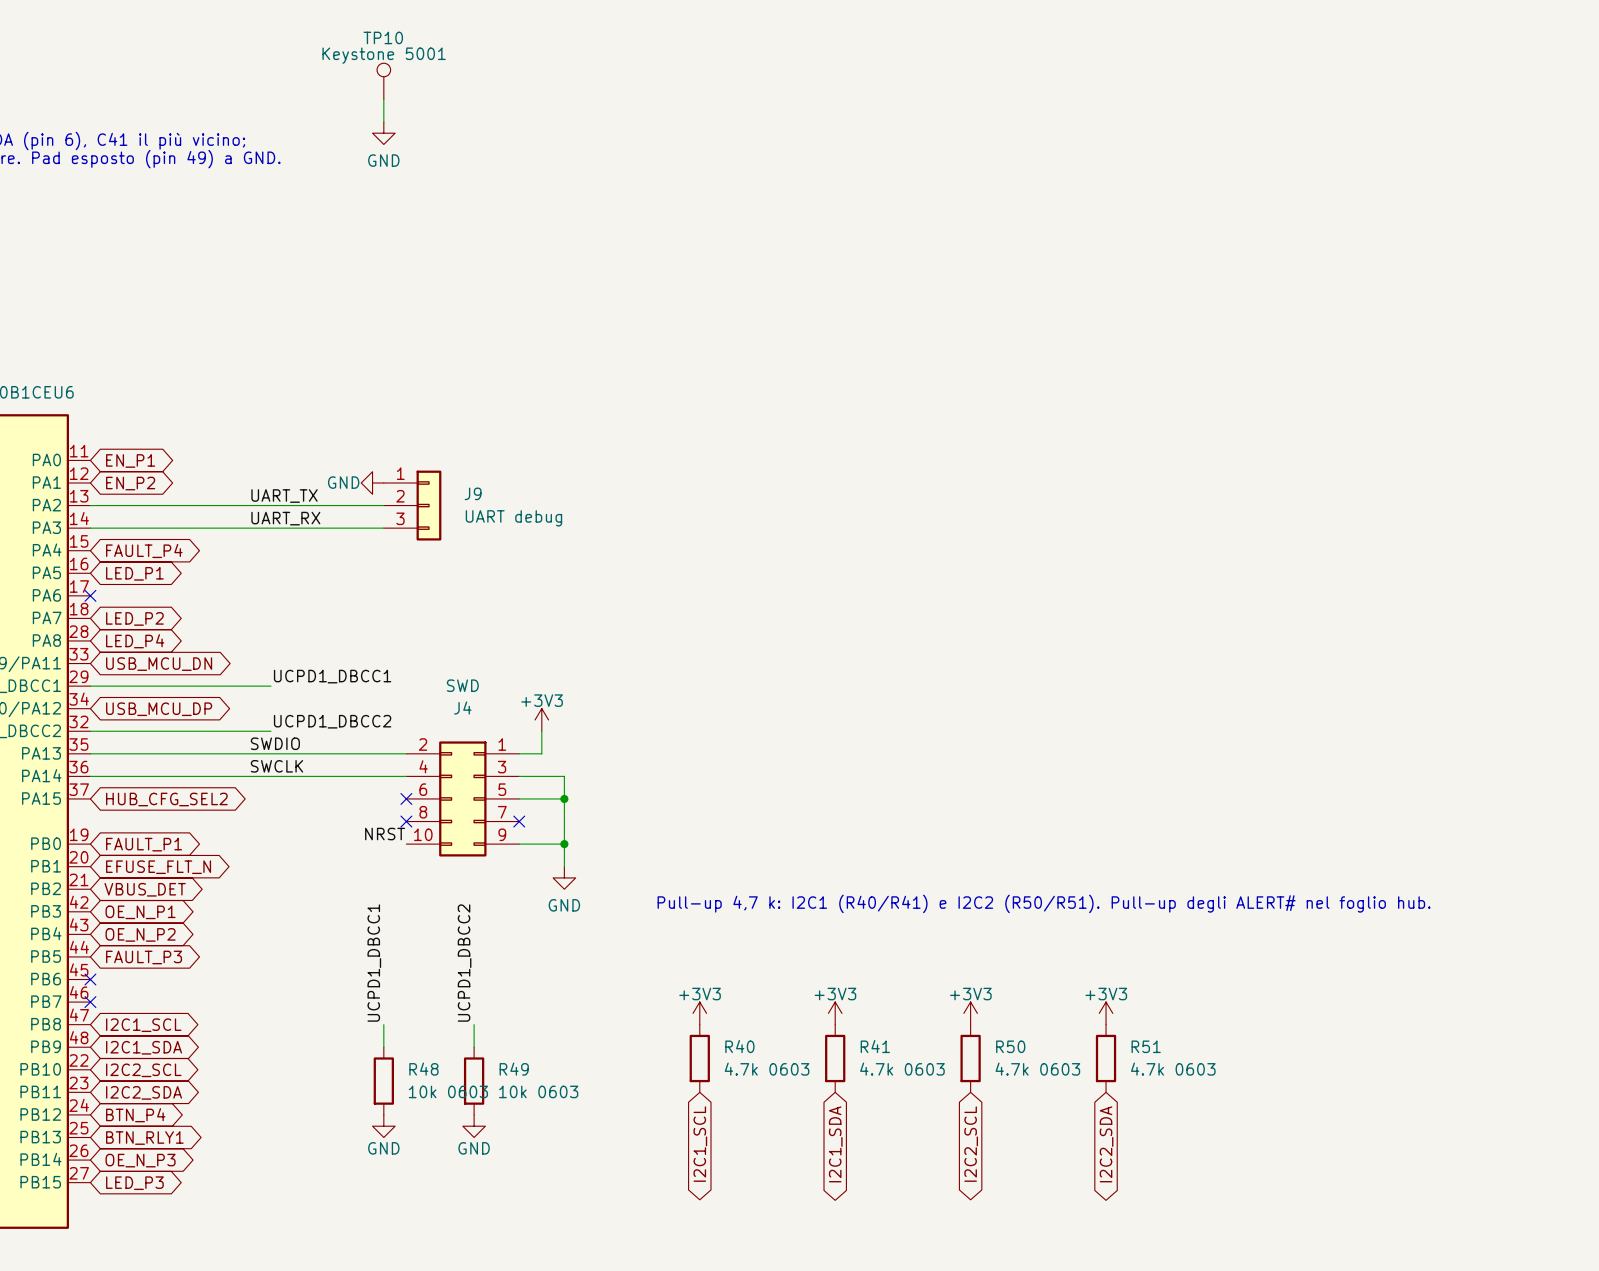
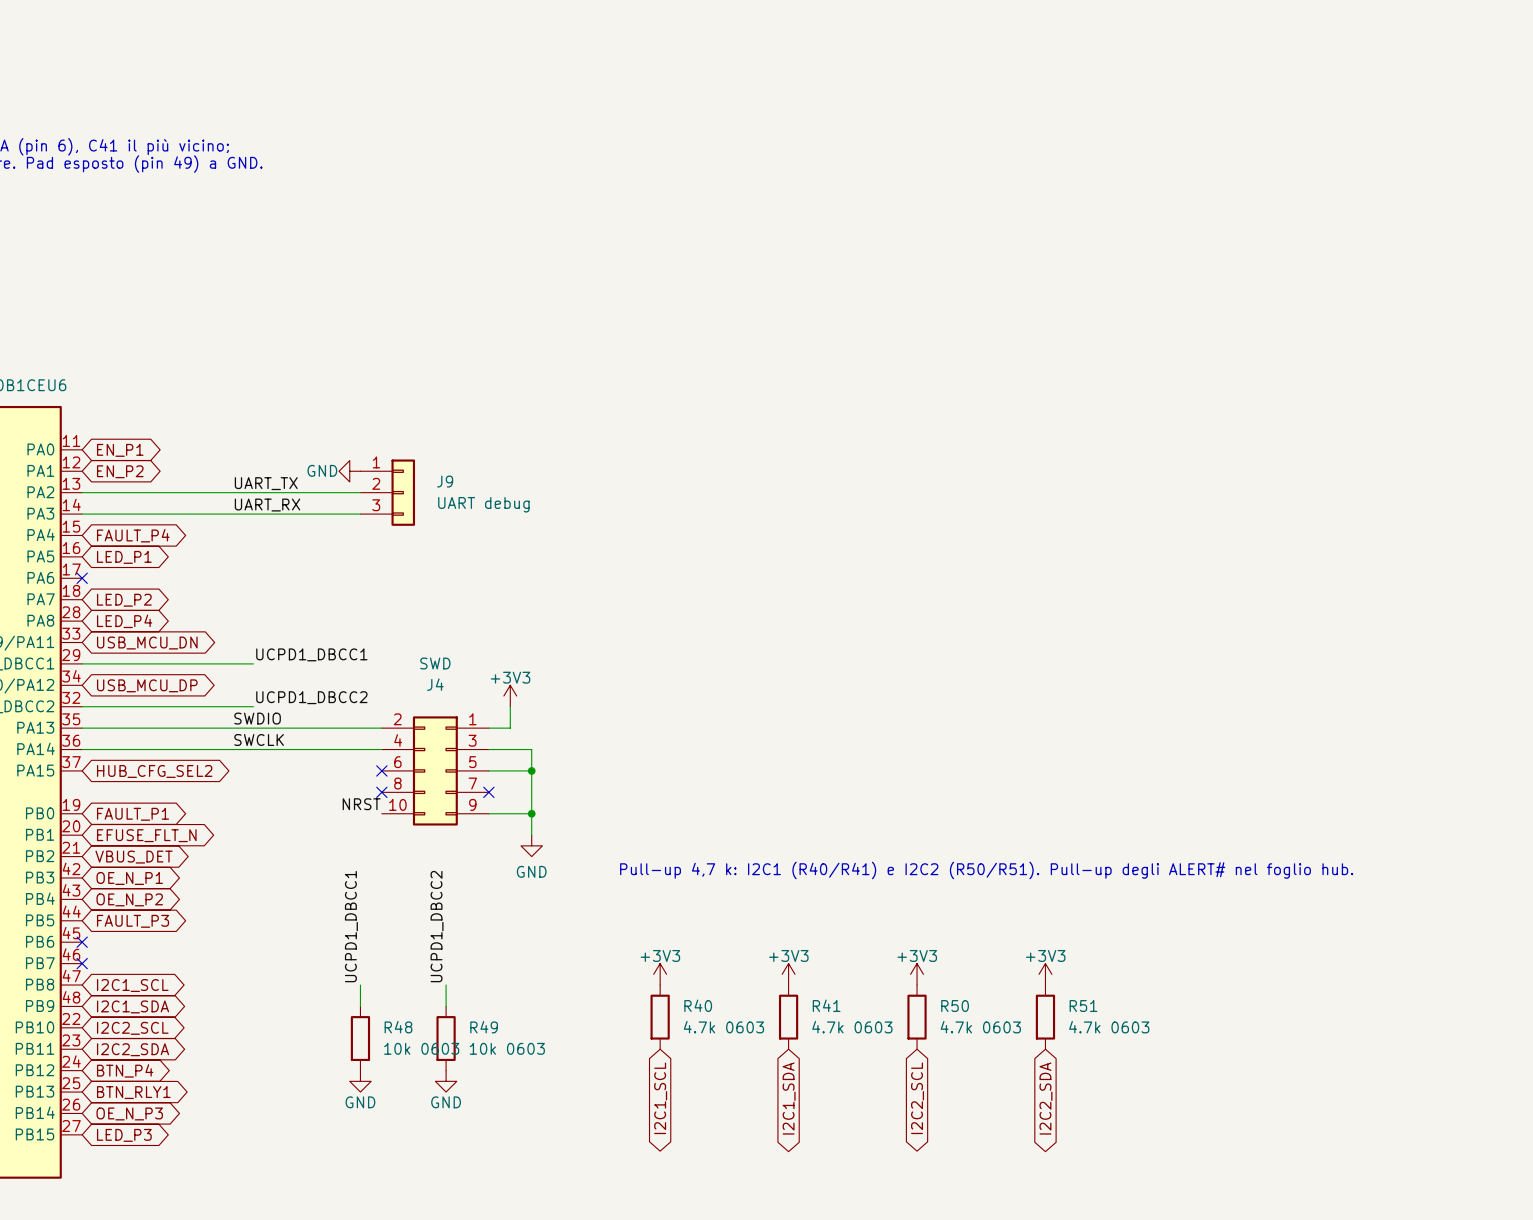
TP10: Keystone 5001 (383, 81) -> none
wire: (383, 99) (383, 121) -> none
power symbol: GND (383, 133) -> none

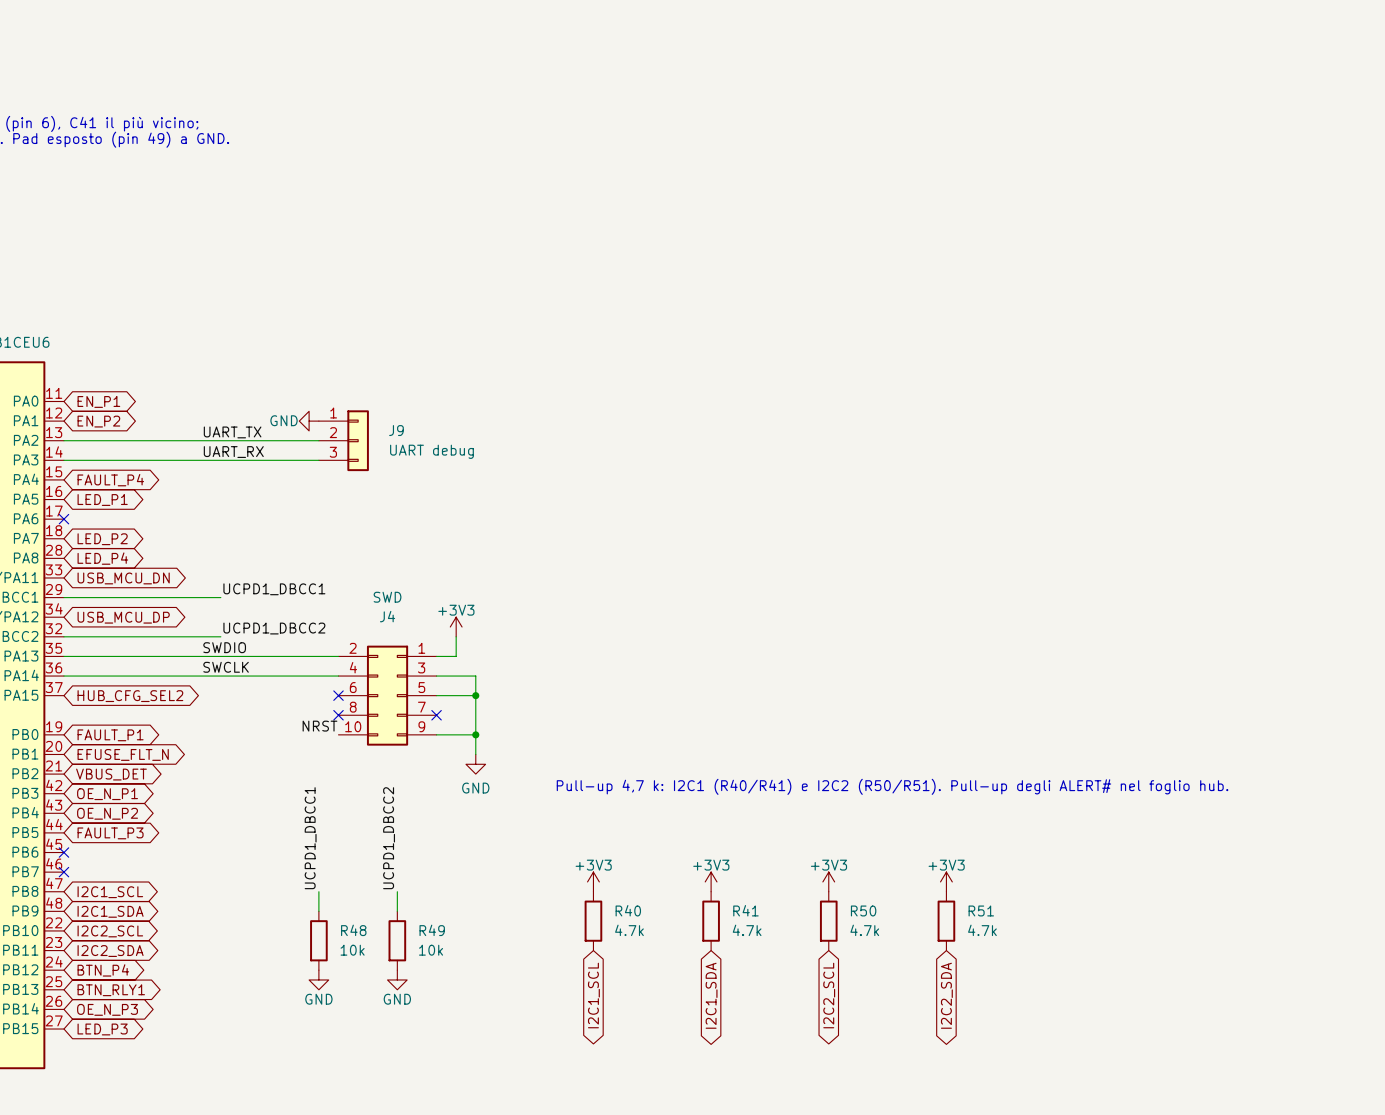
R40 value: 4.7k 0603 (723, 1027) -> 4.7k (629, 930)
R41 value: 4.7k 0603 (852, 1027) -> 4.7k (747, 930)
R50 value: 4.7k 0603 (980, 1027) -> 4.7k (864, 930)
R51 value: 4.7k 0603 (1109, 1027) -> 4.7k (982, 930)
R48 value: 10k 0603 (421, 1048) -> 10k (352, 950)
R49 value: 10k 0603 (507, 1048) -> 10k (431, 950)

